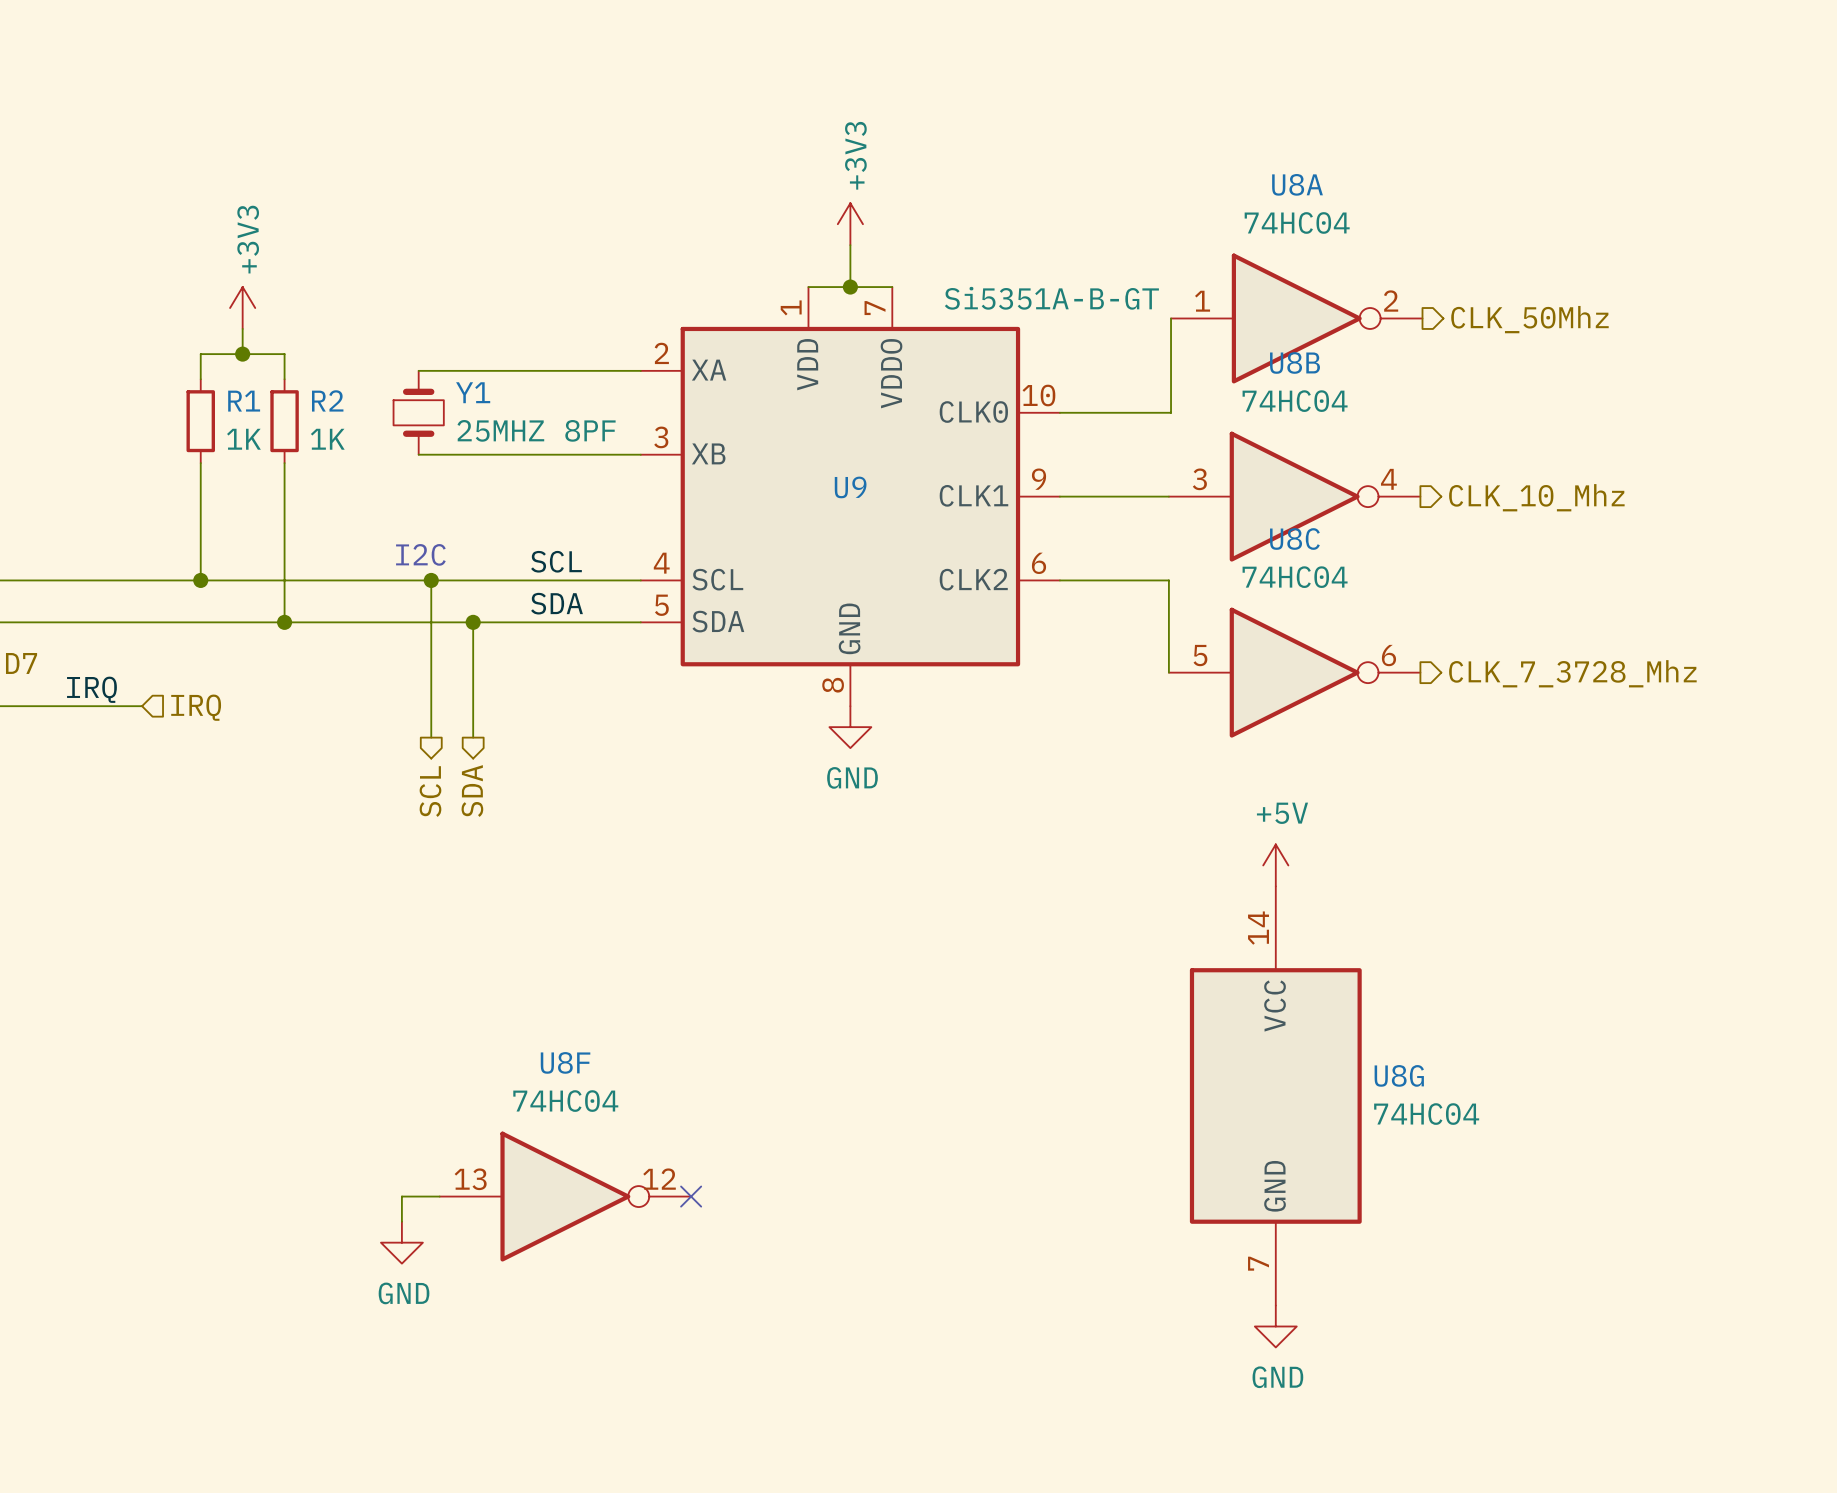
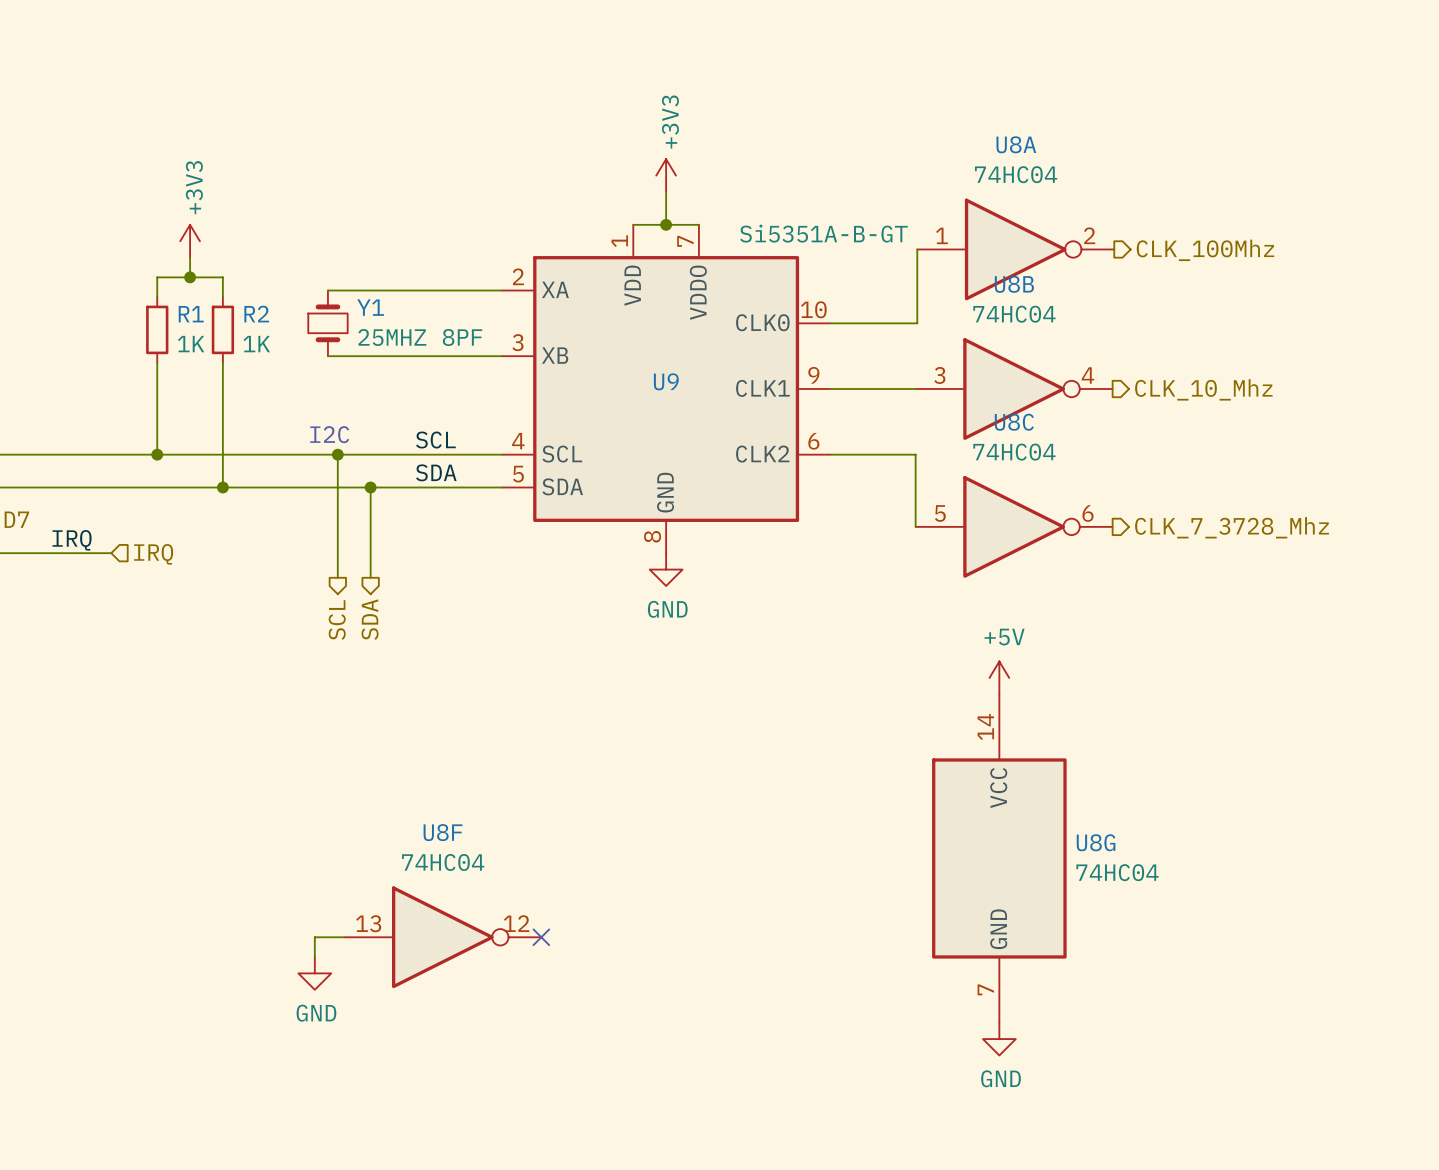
hierarchical label: CLK_50Mhz (1529, 319) -> CLK_100Mhz (1205, 250)

